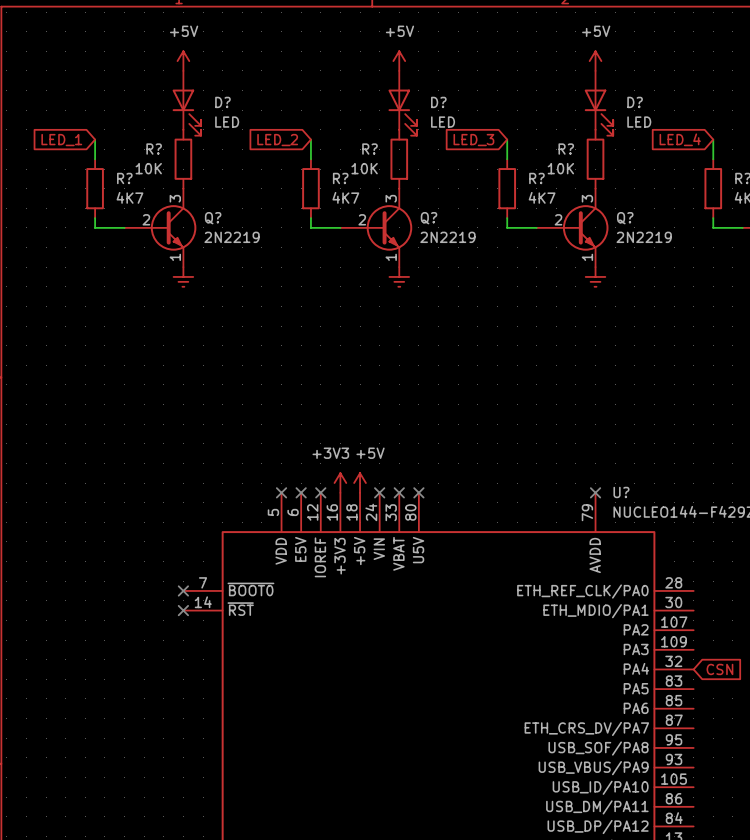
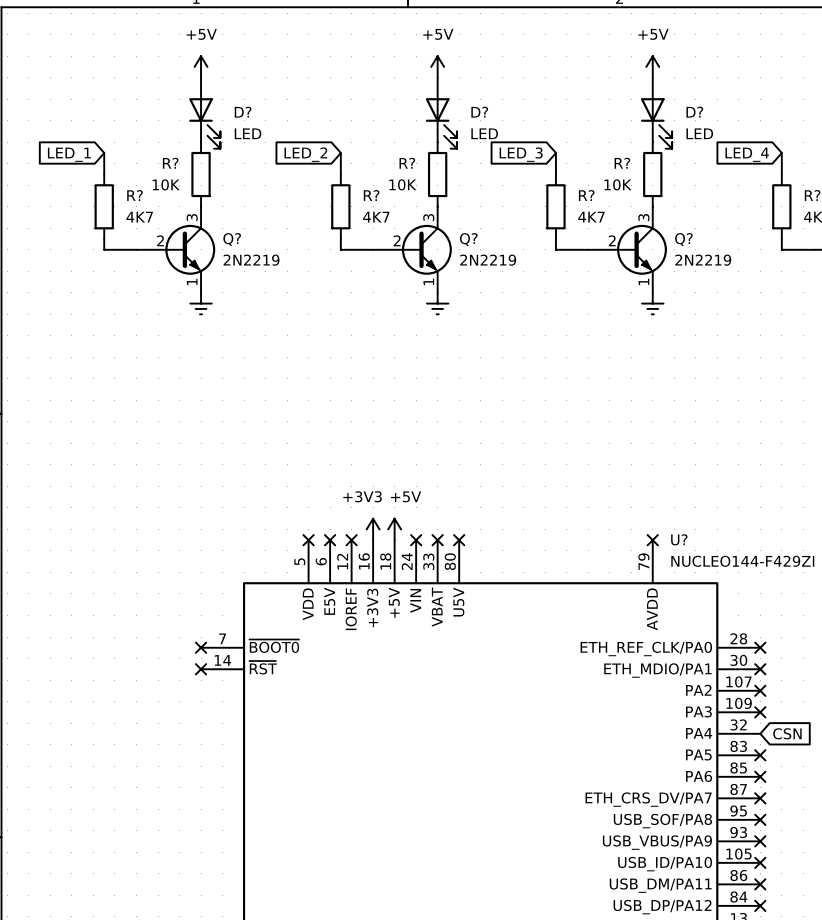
no-connect mark: none -> (760, 647)
no-connect mark: none -> (760, 669)
no-connect mark: none -> (760, 690)
no-connect mark: none -> (760, 712)
no-connect mark: none -> (760, 755)
no-connect mark: none -> (760, 776)
no-connect mark: none -> (760, 798)
no-connect mark: none -> (760, 819)
no-connect mark: none -> (760, 841)
no-connect mark: none -> (760, 862)
no-connect mark: none -> (760, 884)
no-connect mark: none -> (760, 905)

